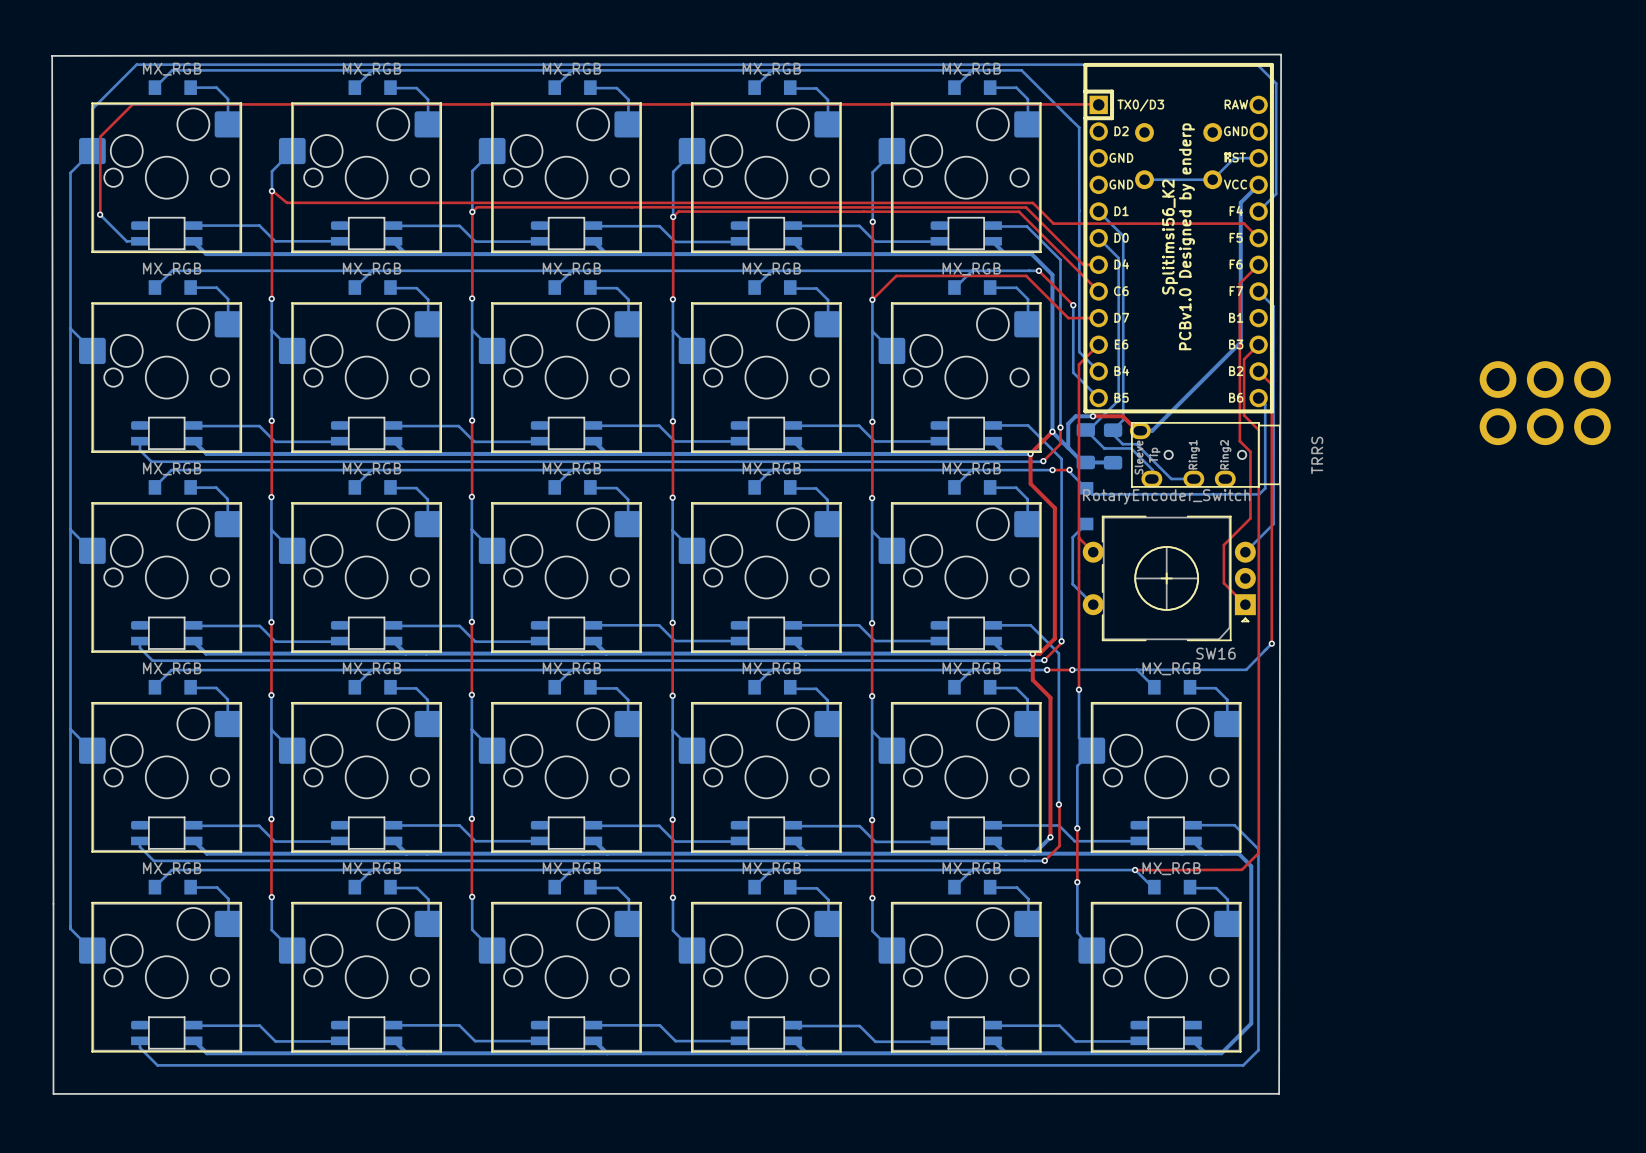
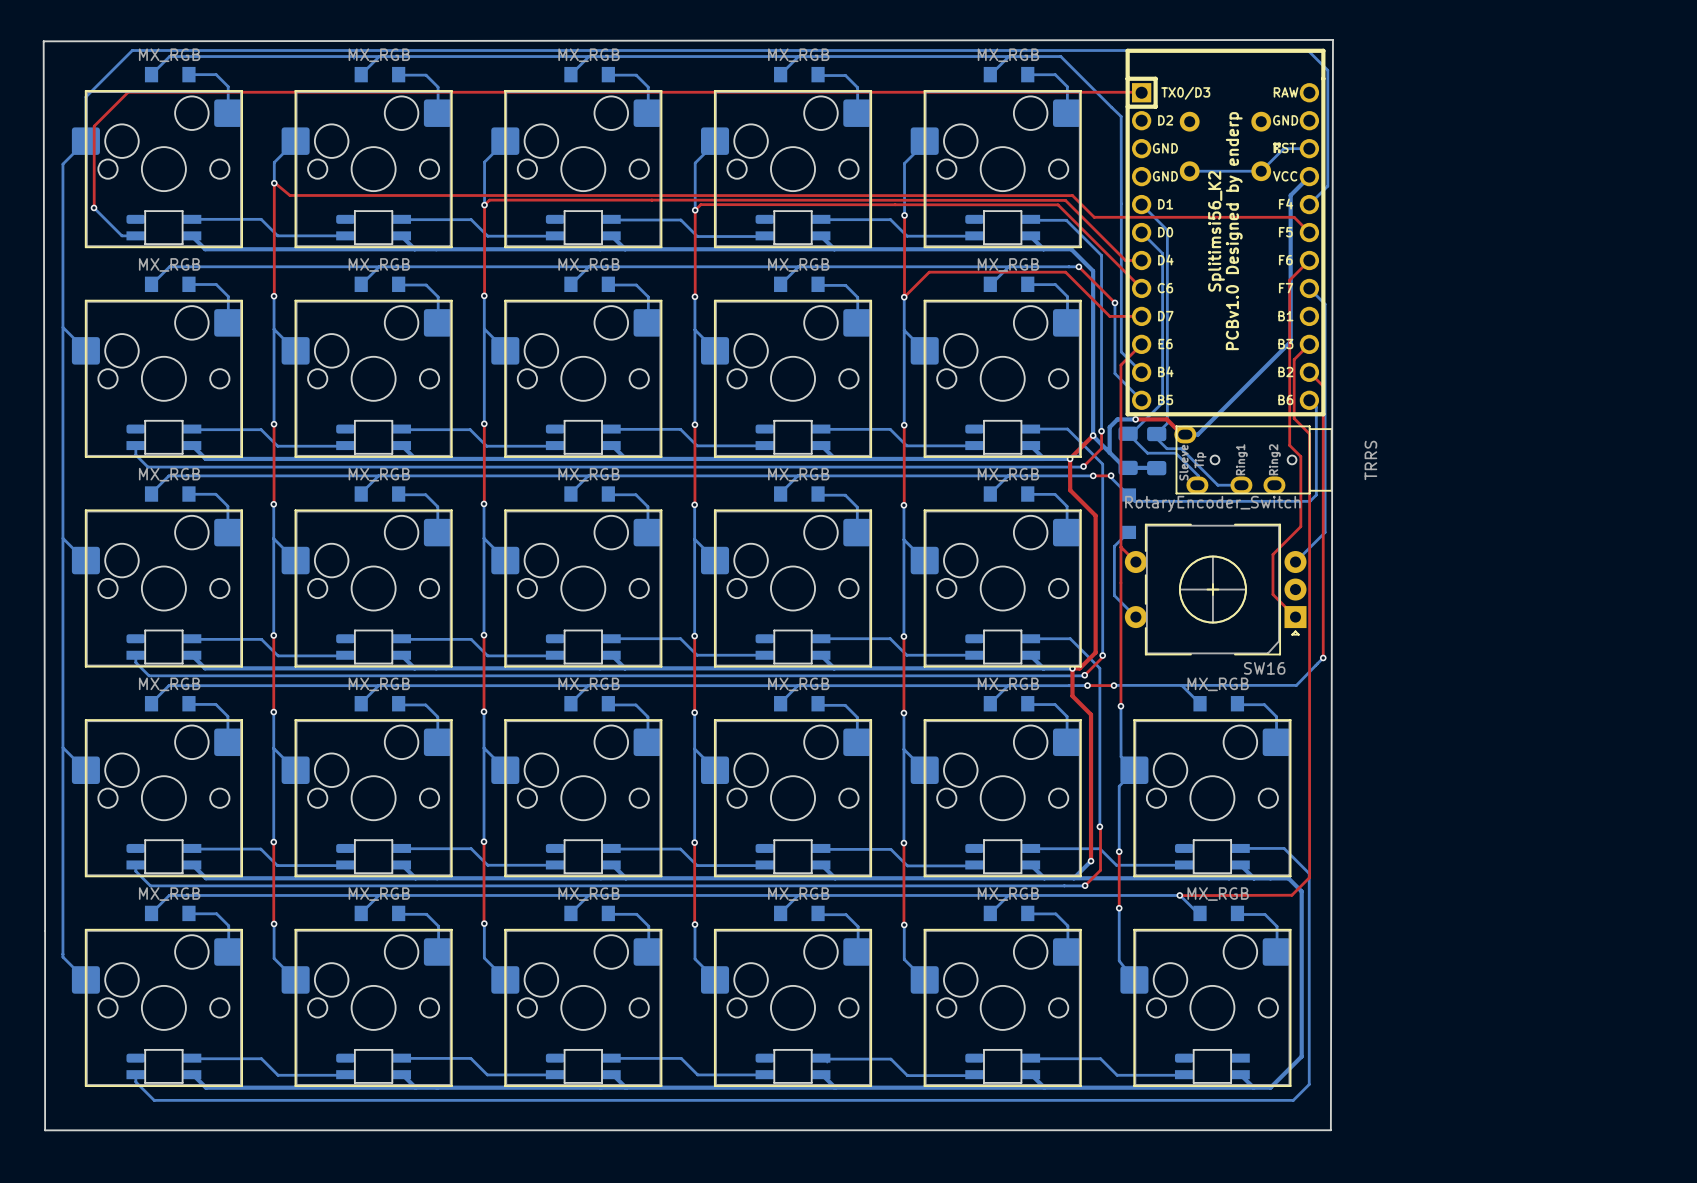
part: (1498, 379) -> none
part: (1545, 379) -> none
part: (1592, 379) -> none
part: (1498, 426) -> none
part: (1545, 426) -> none
part: (1592, 426) -> none

